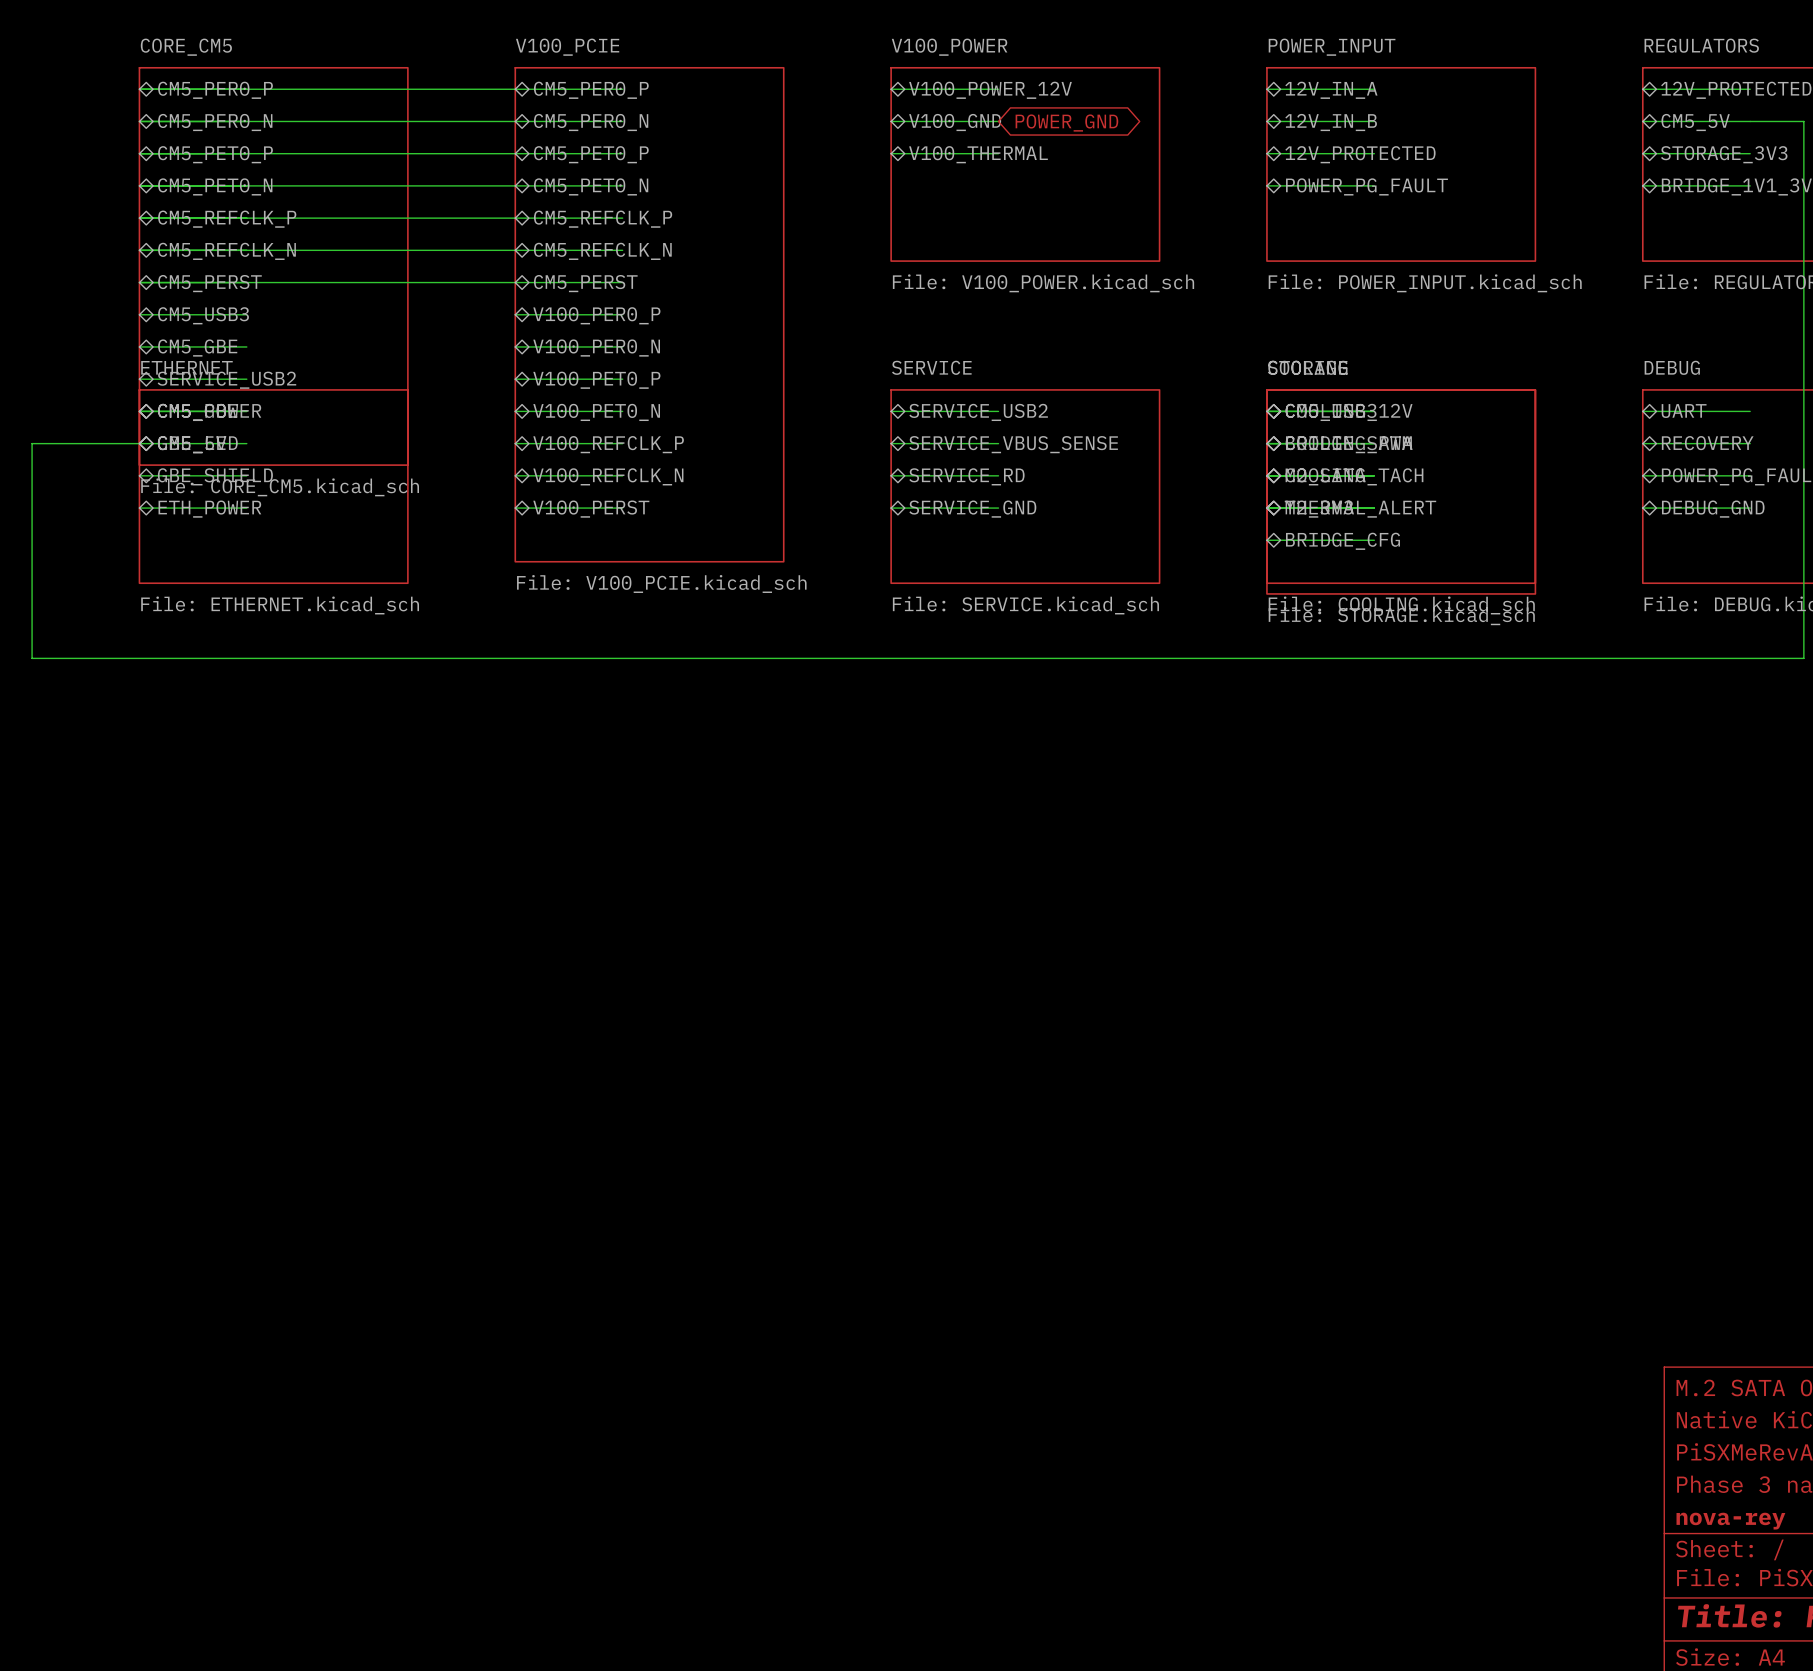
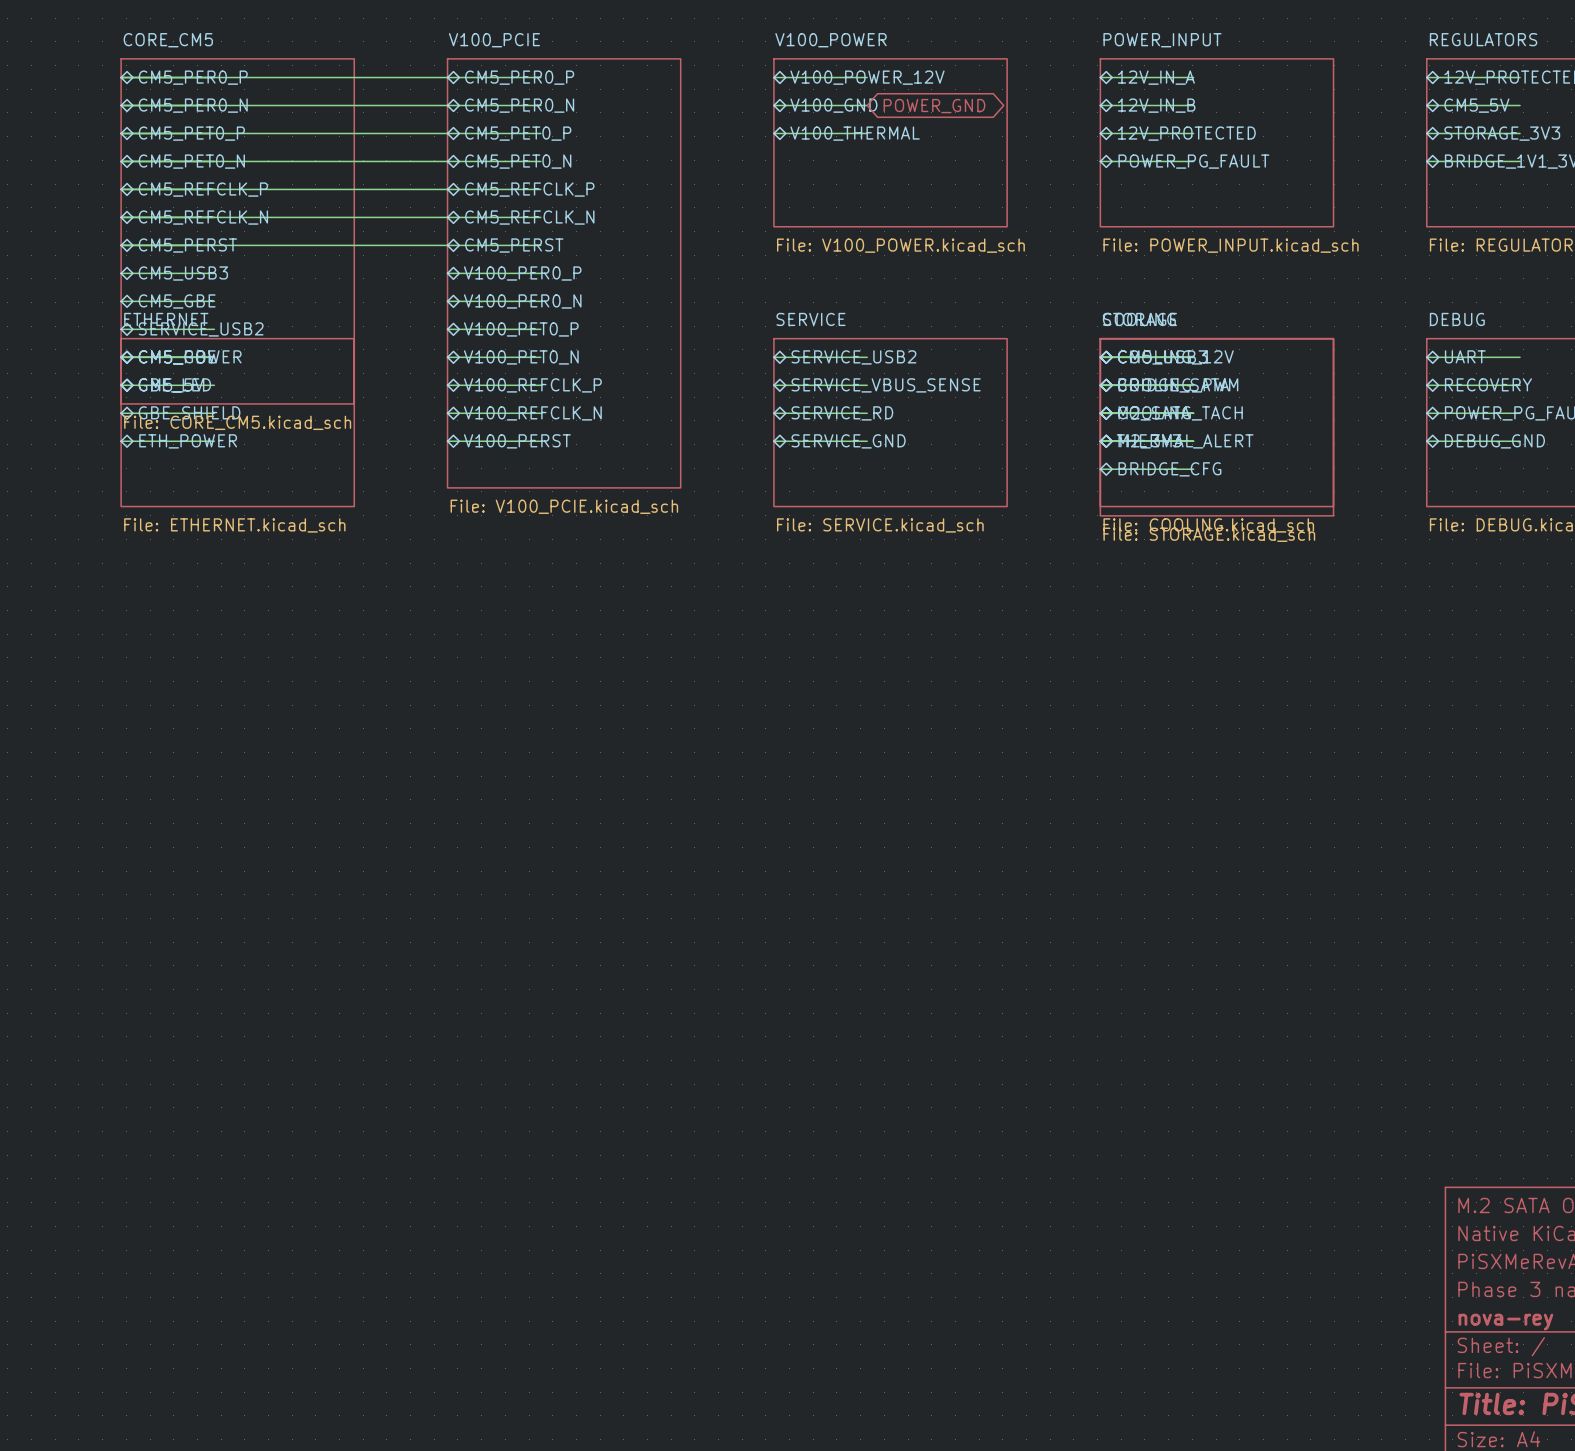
wire: (1750, 121) (1803, 121) (1803, 658) (32, 658) (32, 443) (139, 443) -> none

